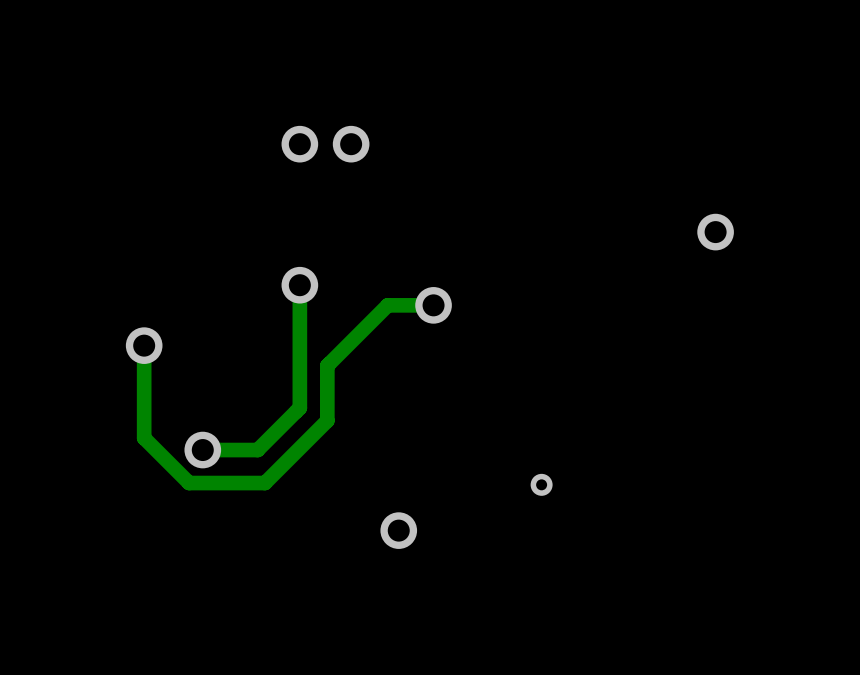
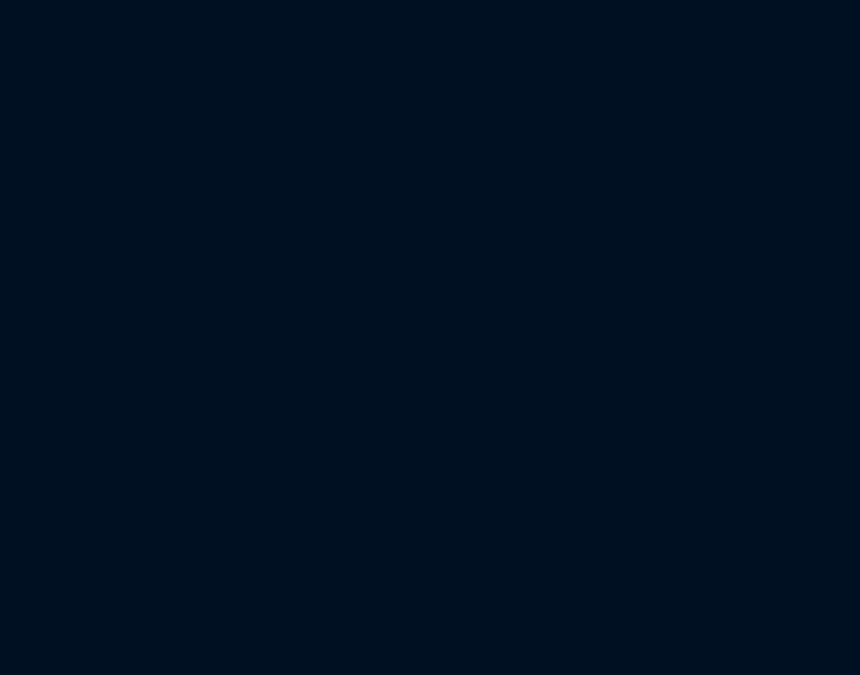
via: (299, 144) -> none
via: (351, 144) -> none
via: (715, 232) -> none
track: (299, 285) (299, 407) (257, 450) (202, 450) -> none
via: (299, 285) -> none
track: (433, 305) (387, 305) (327, 365) (327, 420) (265, 483) (189, 483) (144, 438) (144, 345) -> none
via: (433, 305) -> none
via: (144, 345) -> none
via: (202, 450) -> none
via: (541, 484) -> none
via: (398, 530) -> none

